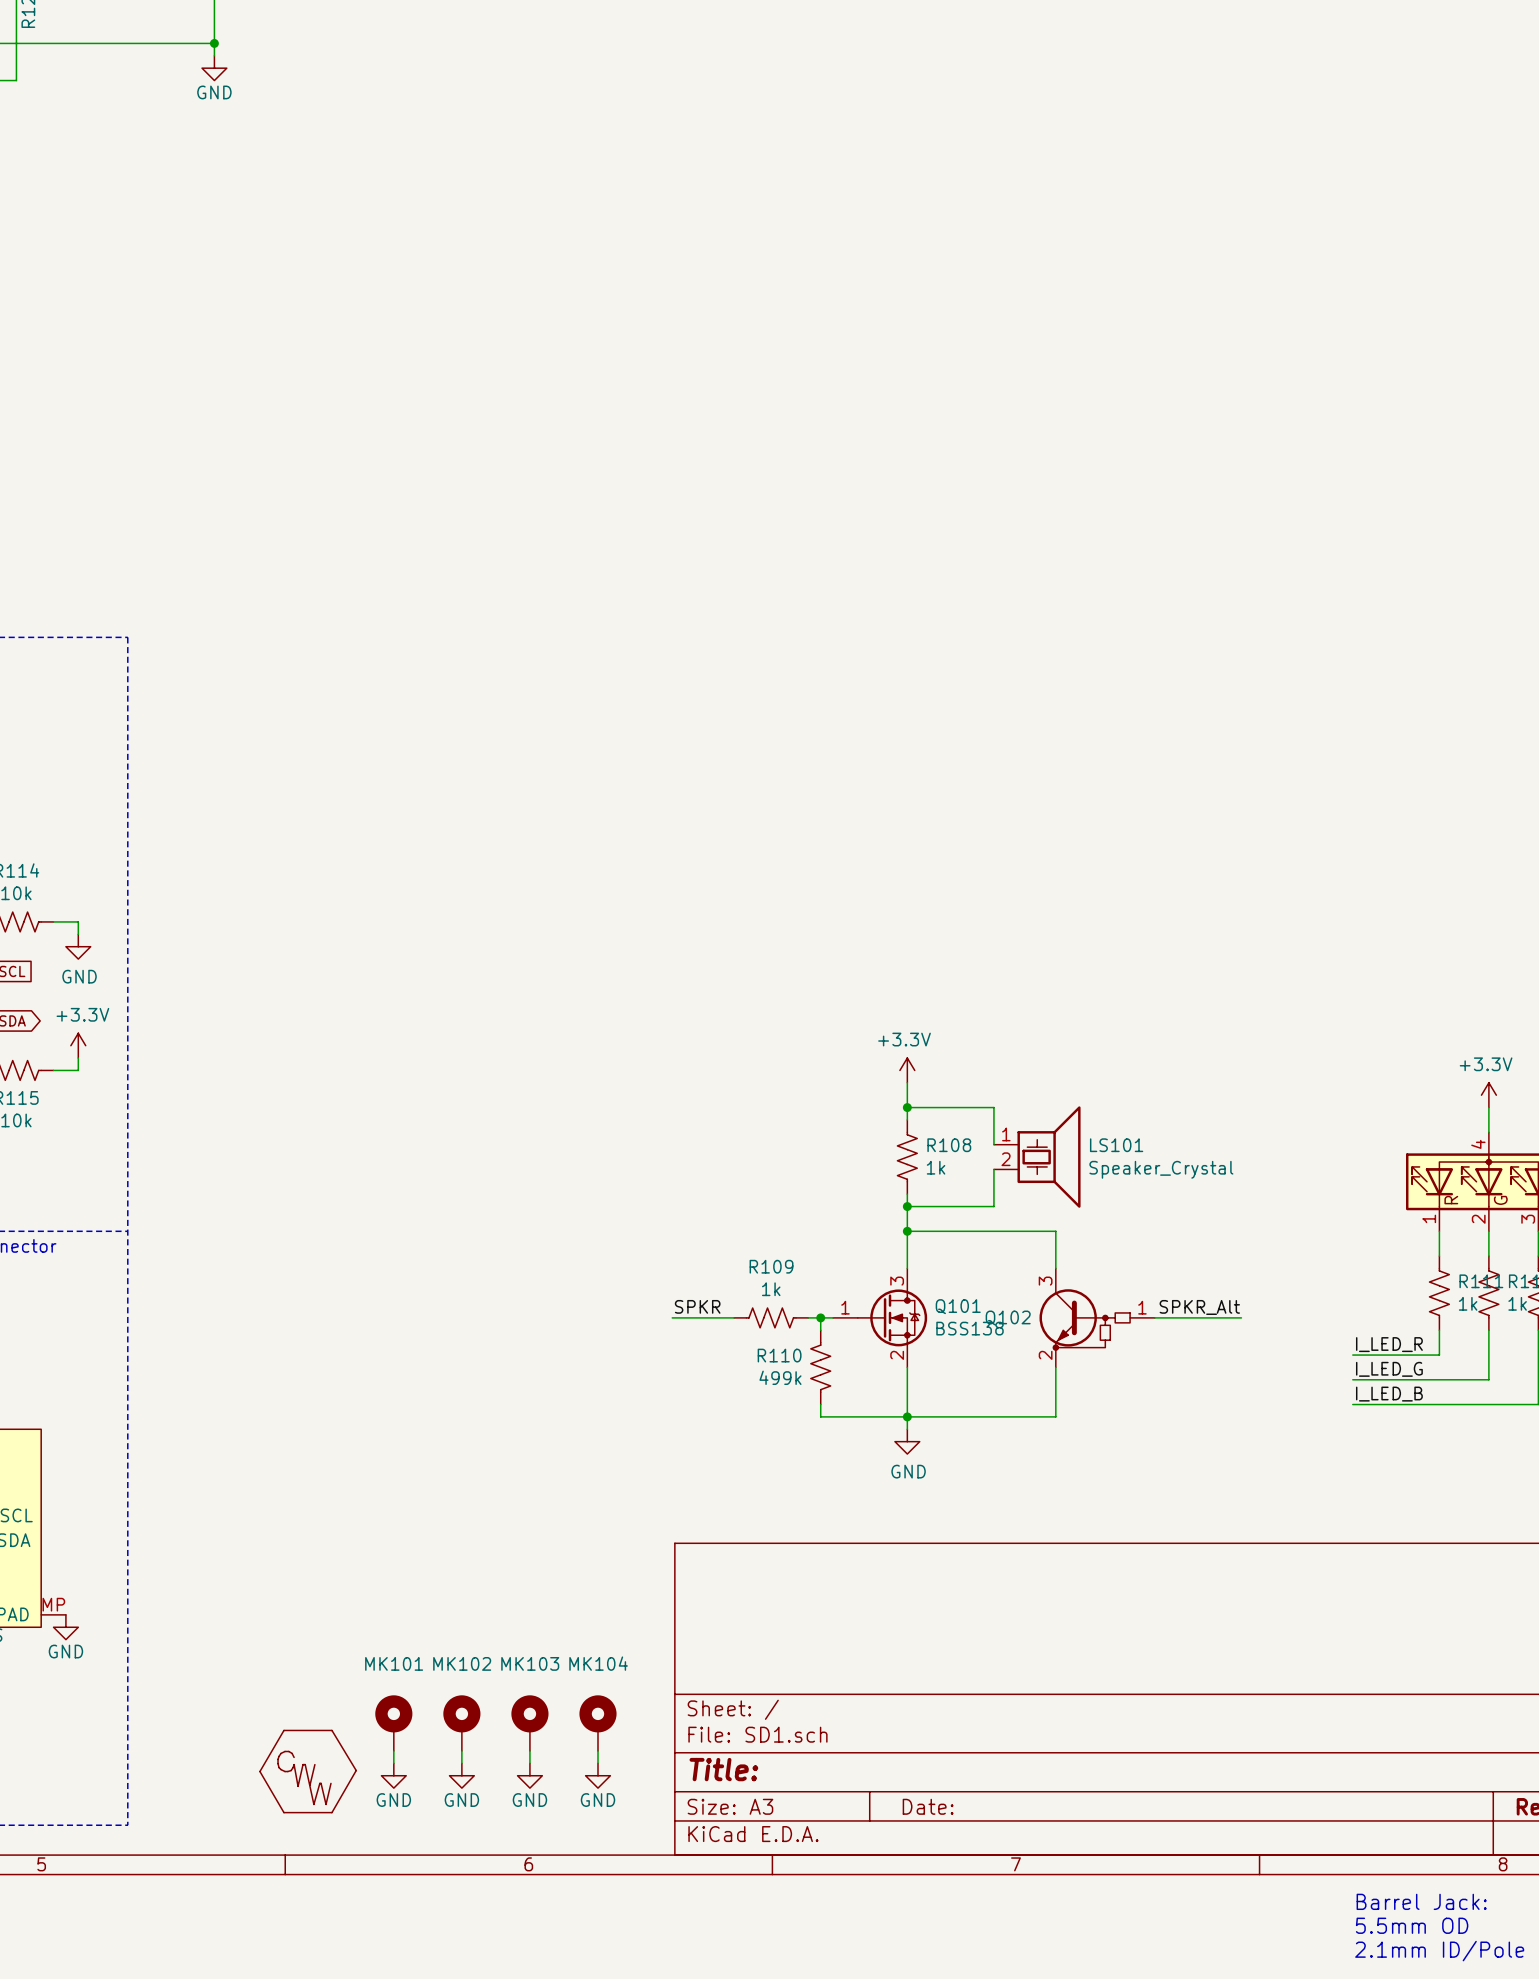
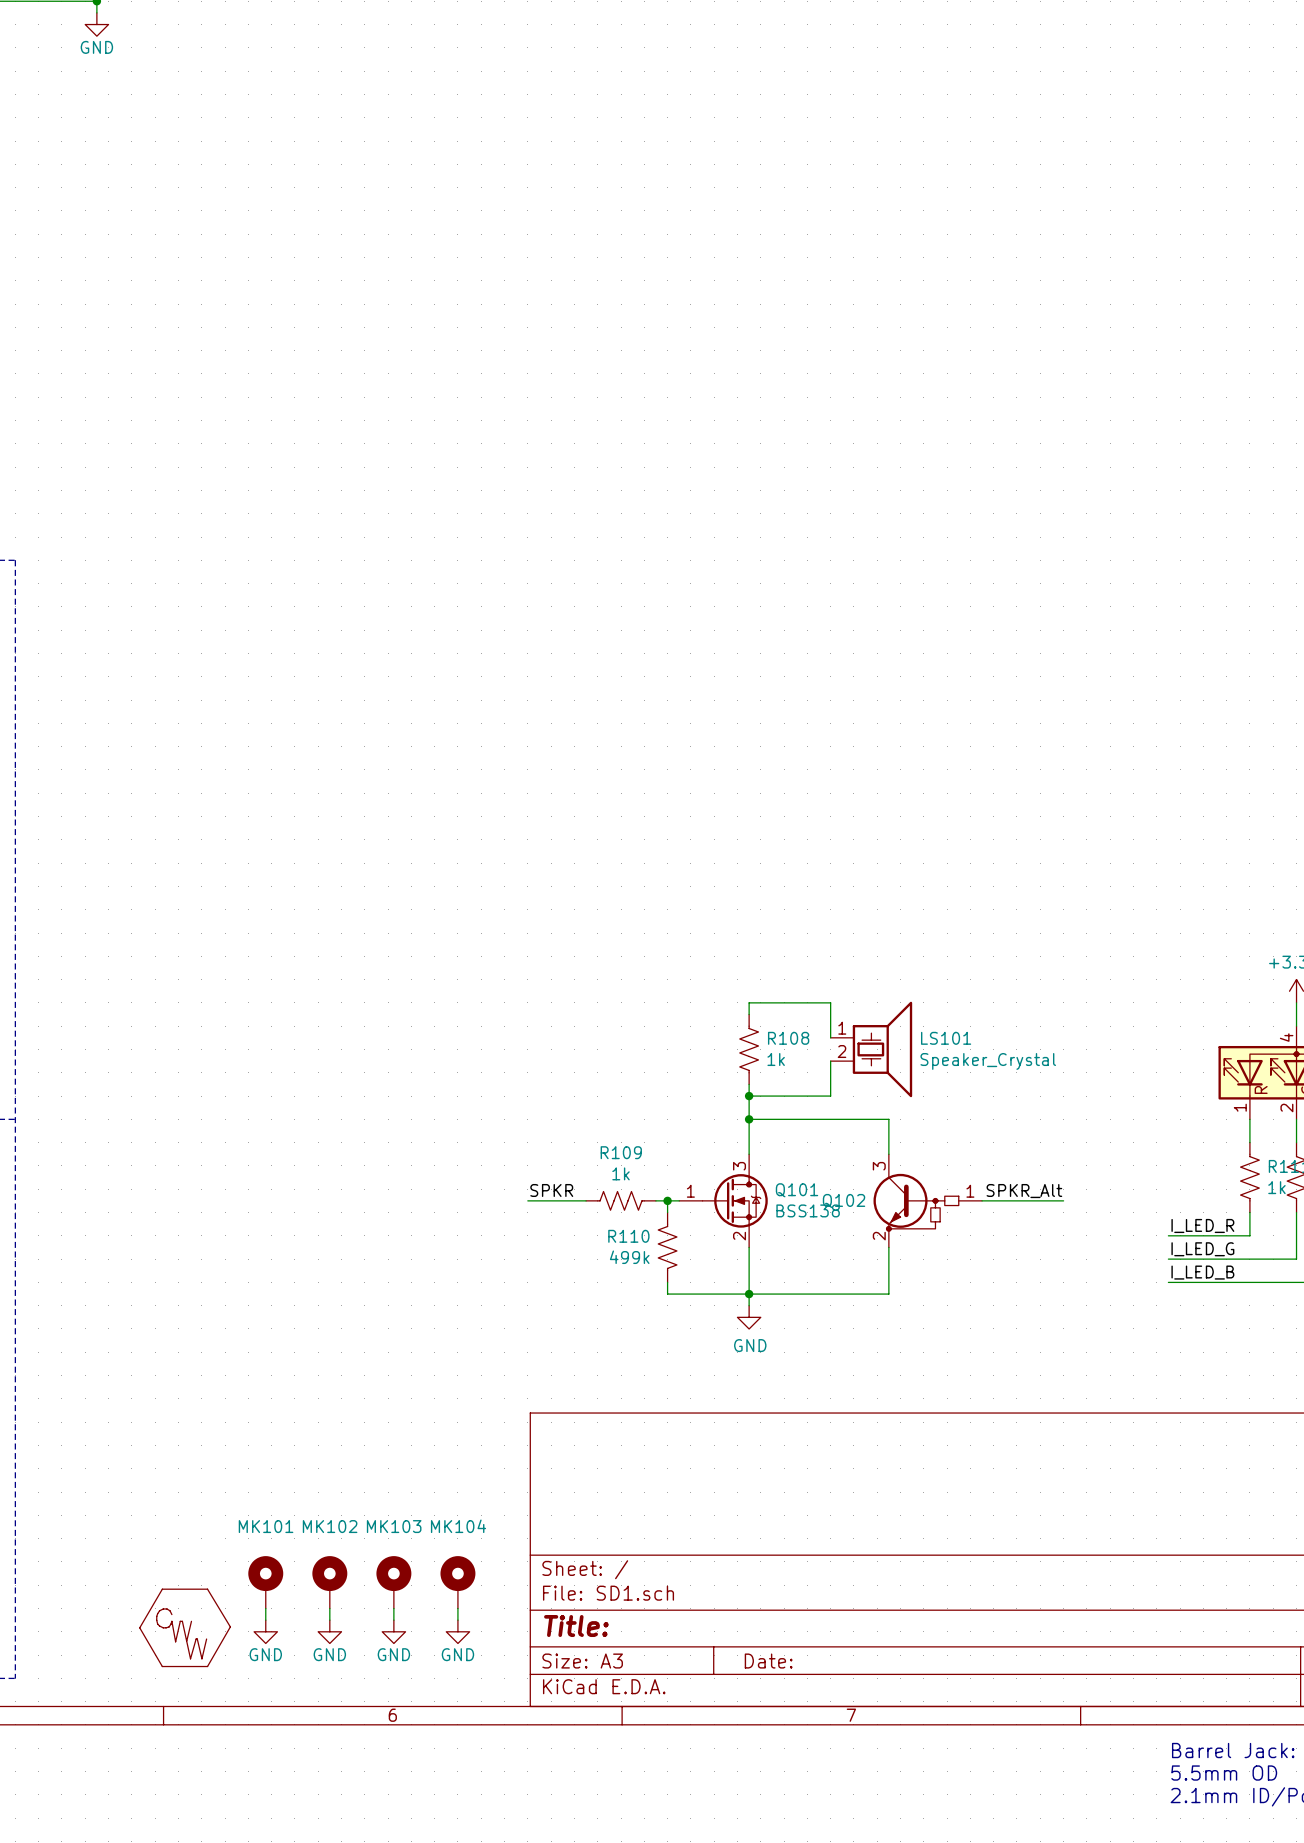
power symbol: +3.3V (907, 1070) -> none
wire: (907, 1082) (907, 1107) -> none
junction: (907, 1107) -> none

